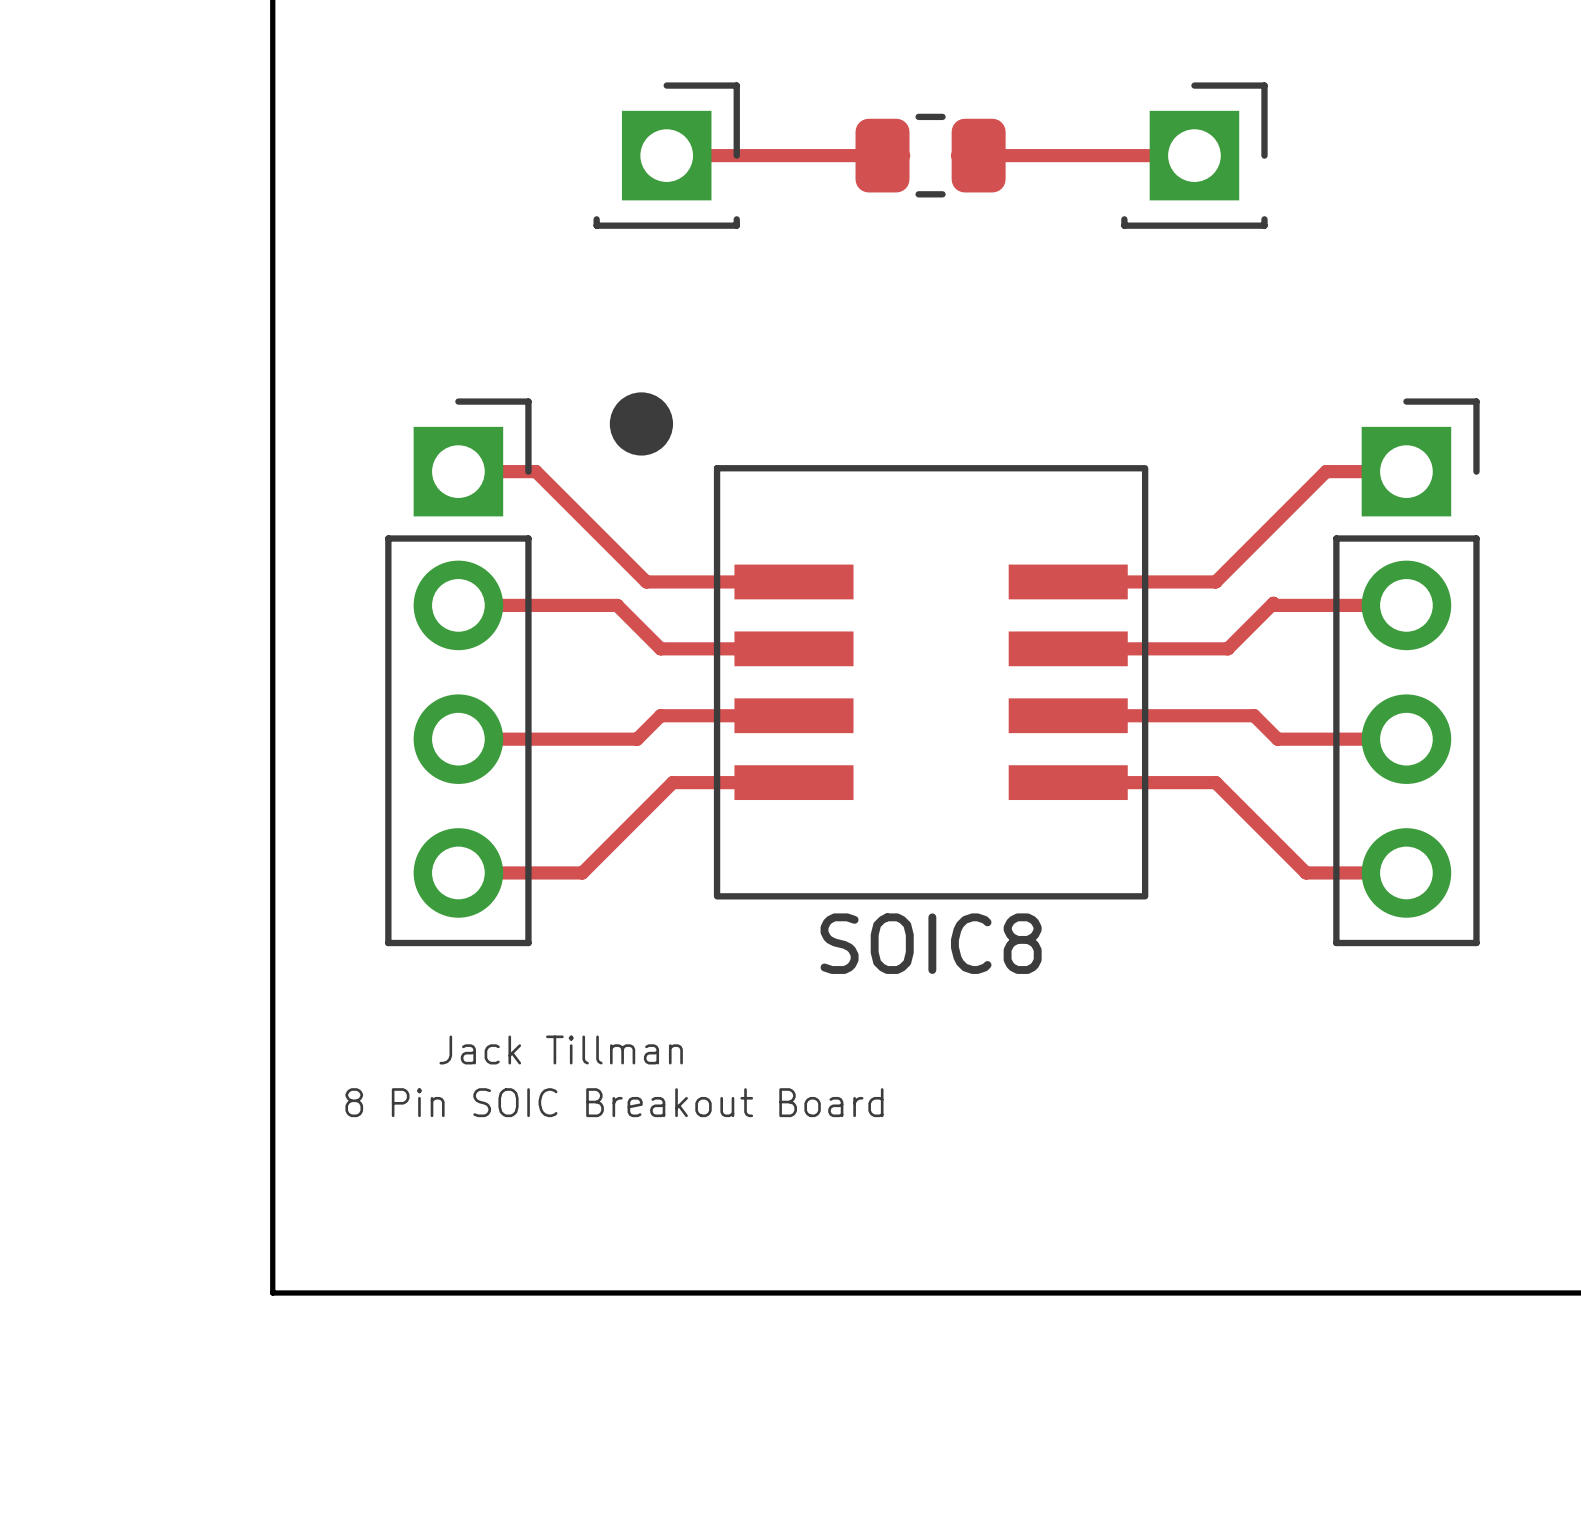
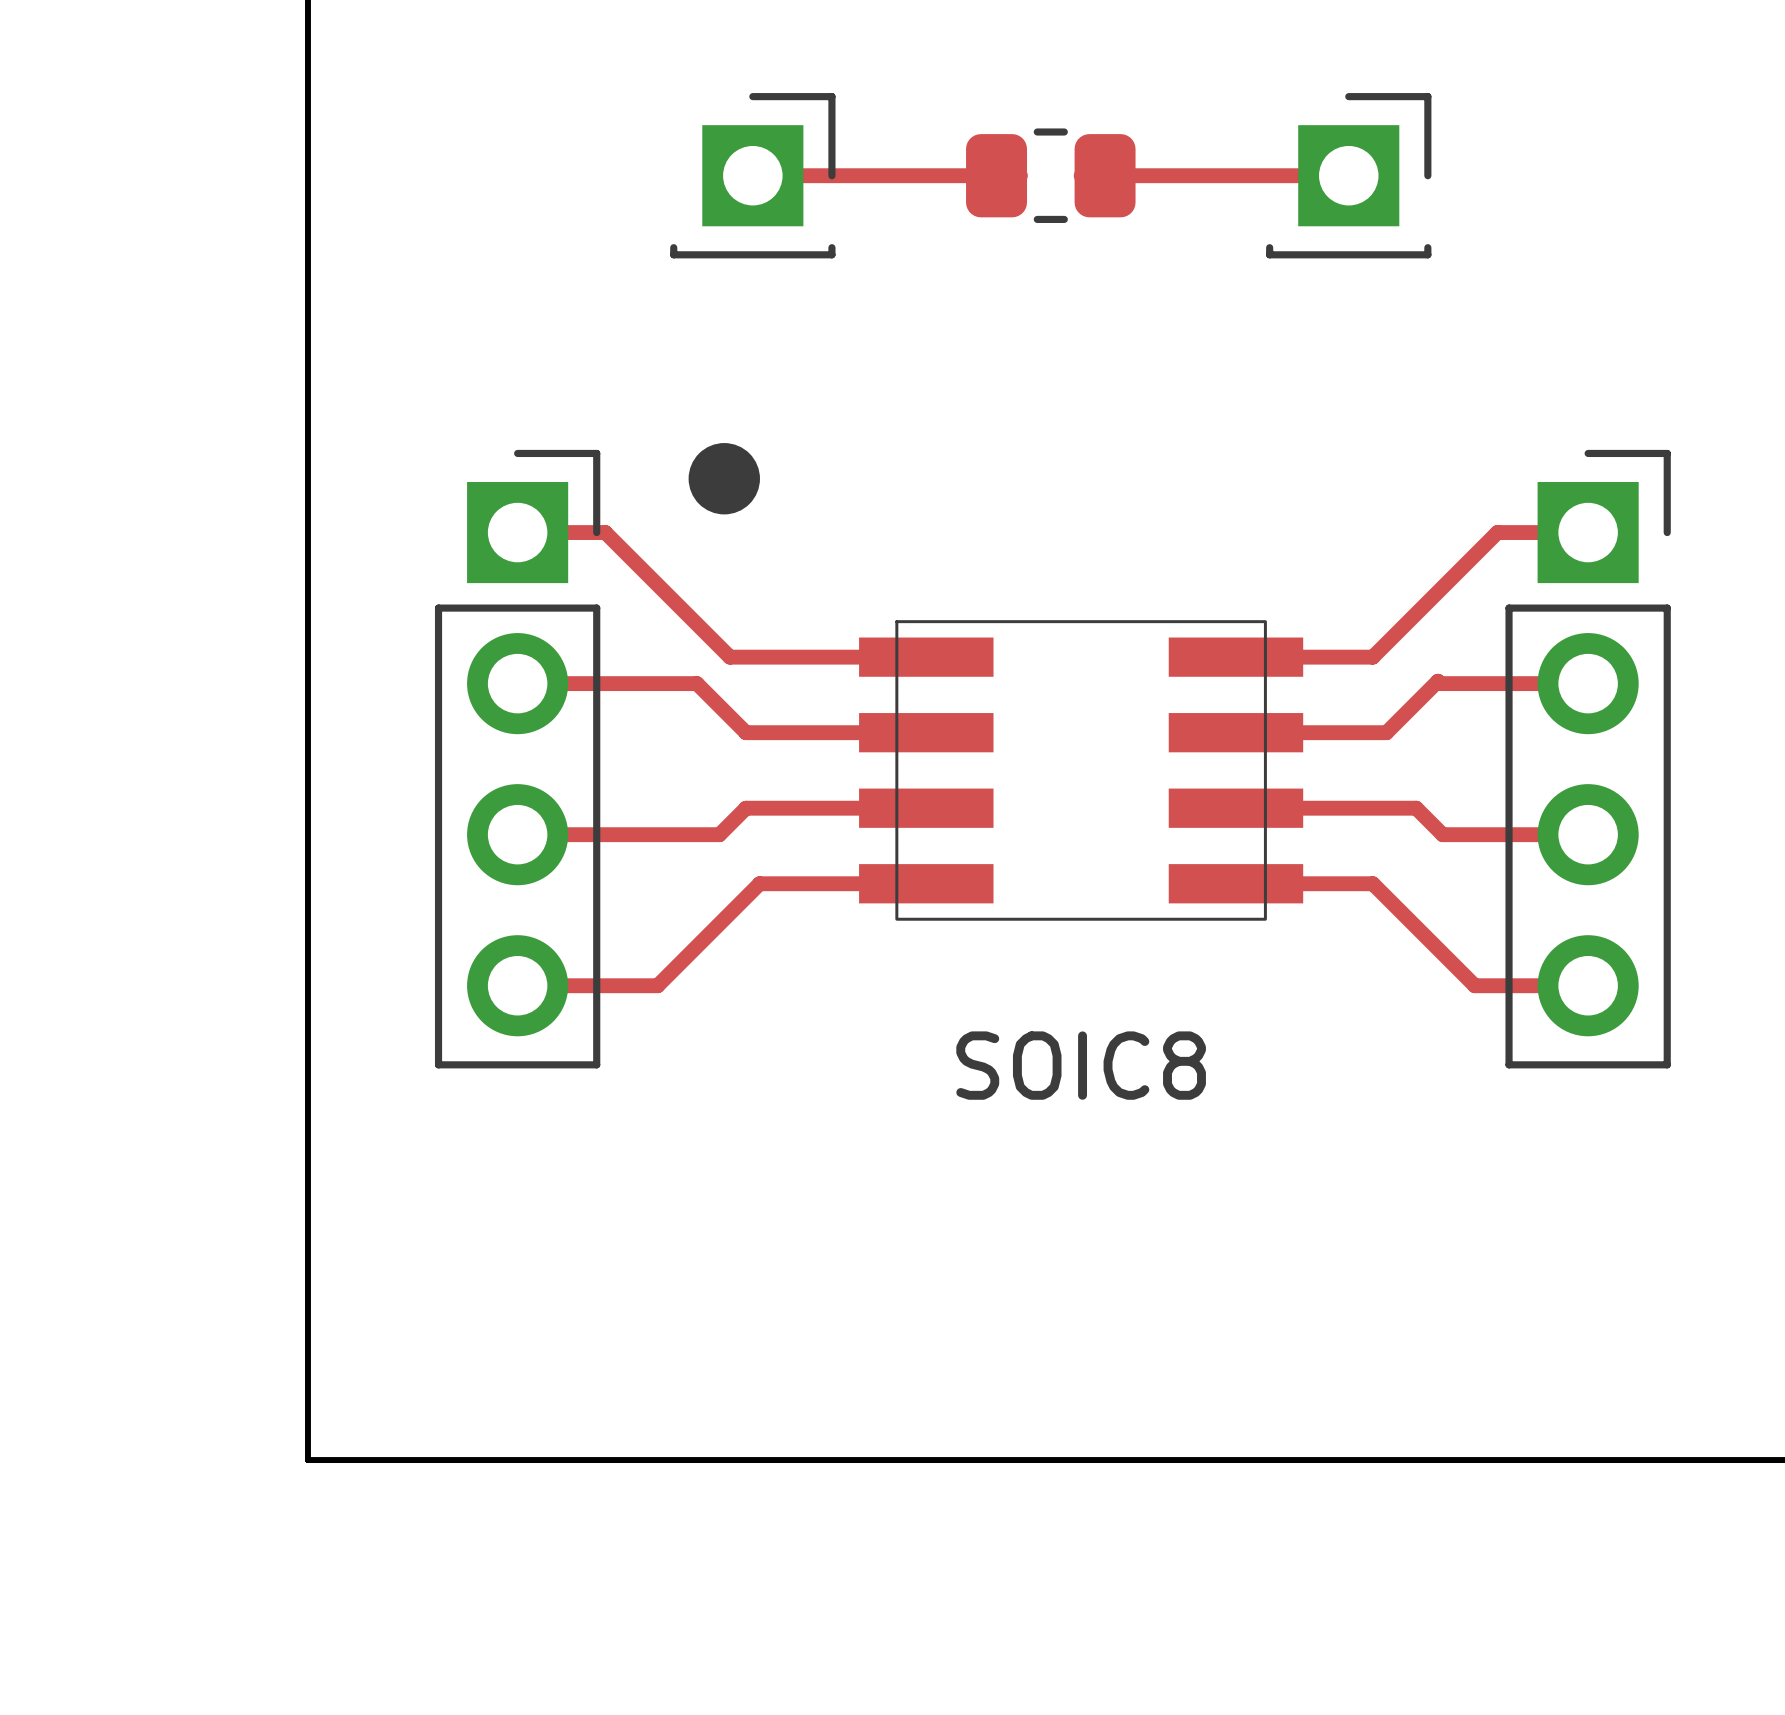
SOIC8 footprint: [713, 465, 1149, 900] -> [859, 620, 1304, 921]
text: Jack Tillman (561, 1049) -> none
text: 8 Pin SOIC Breakout Board (614, 1102) -> none

